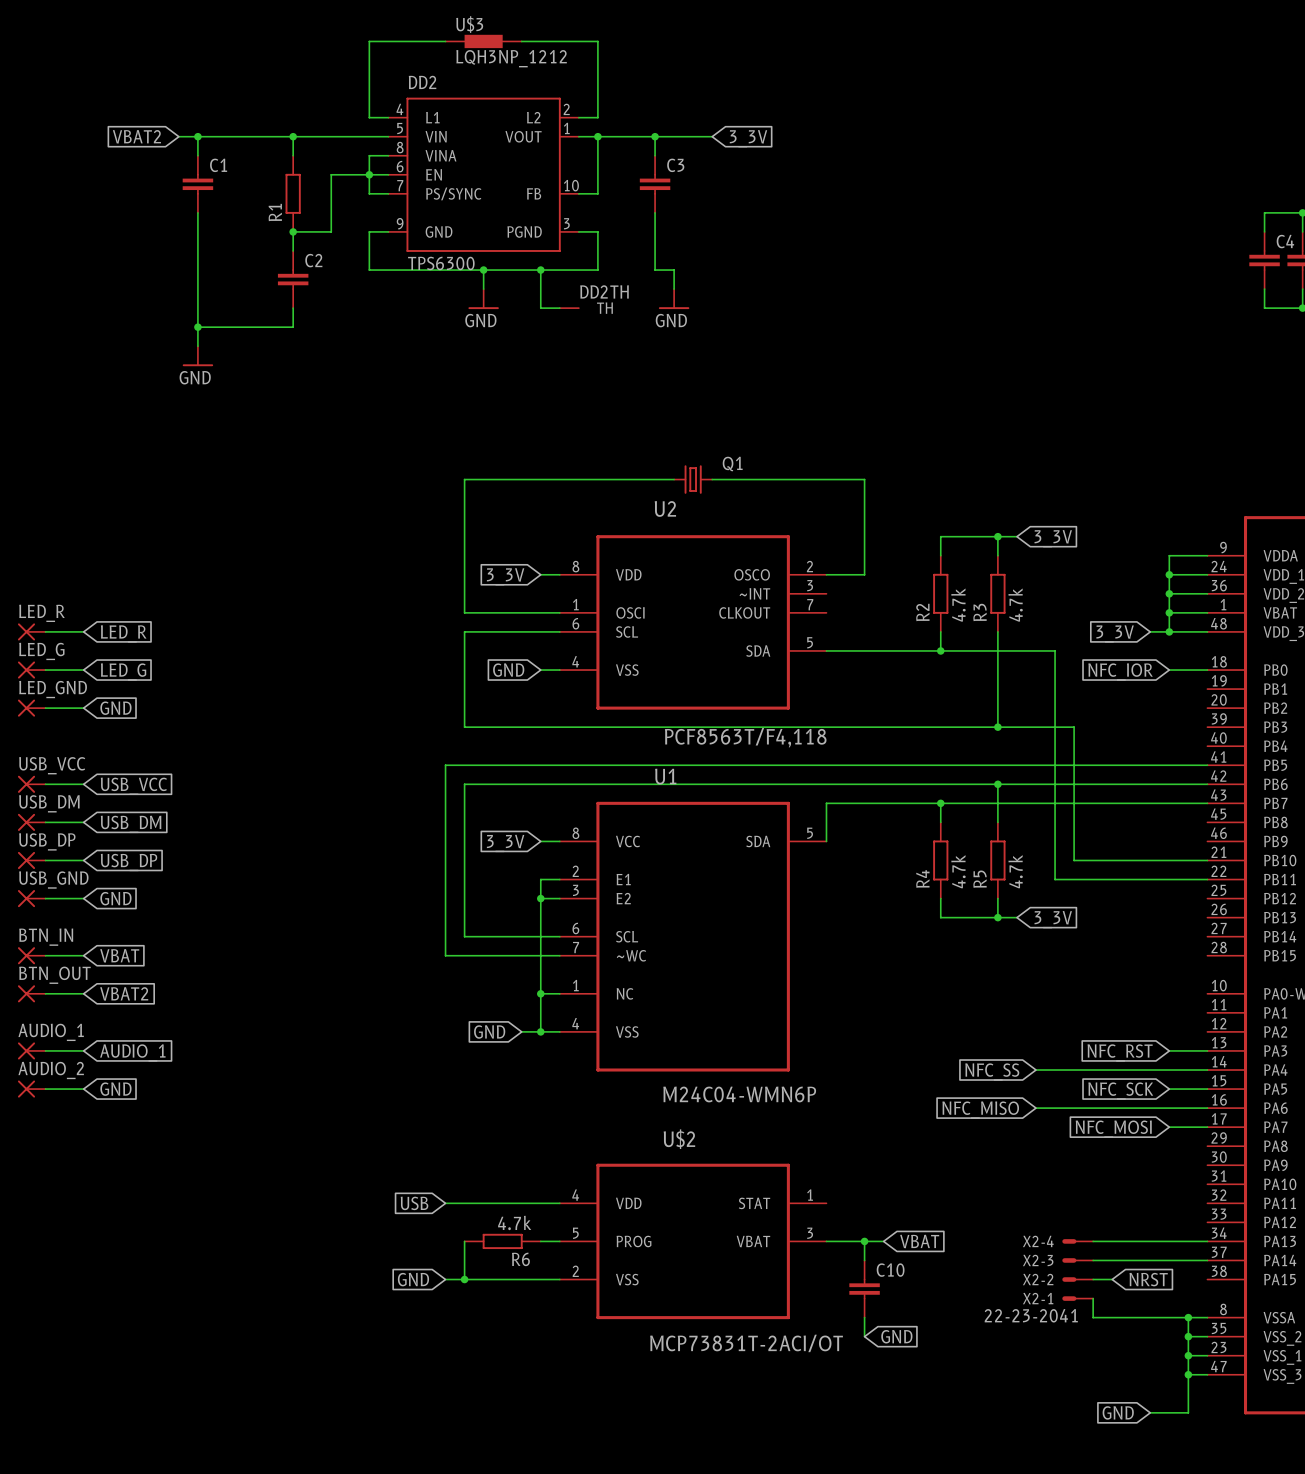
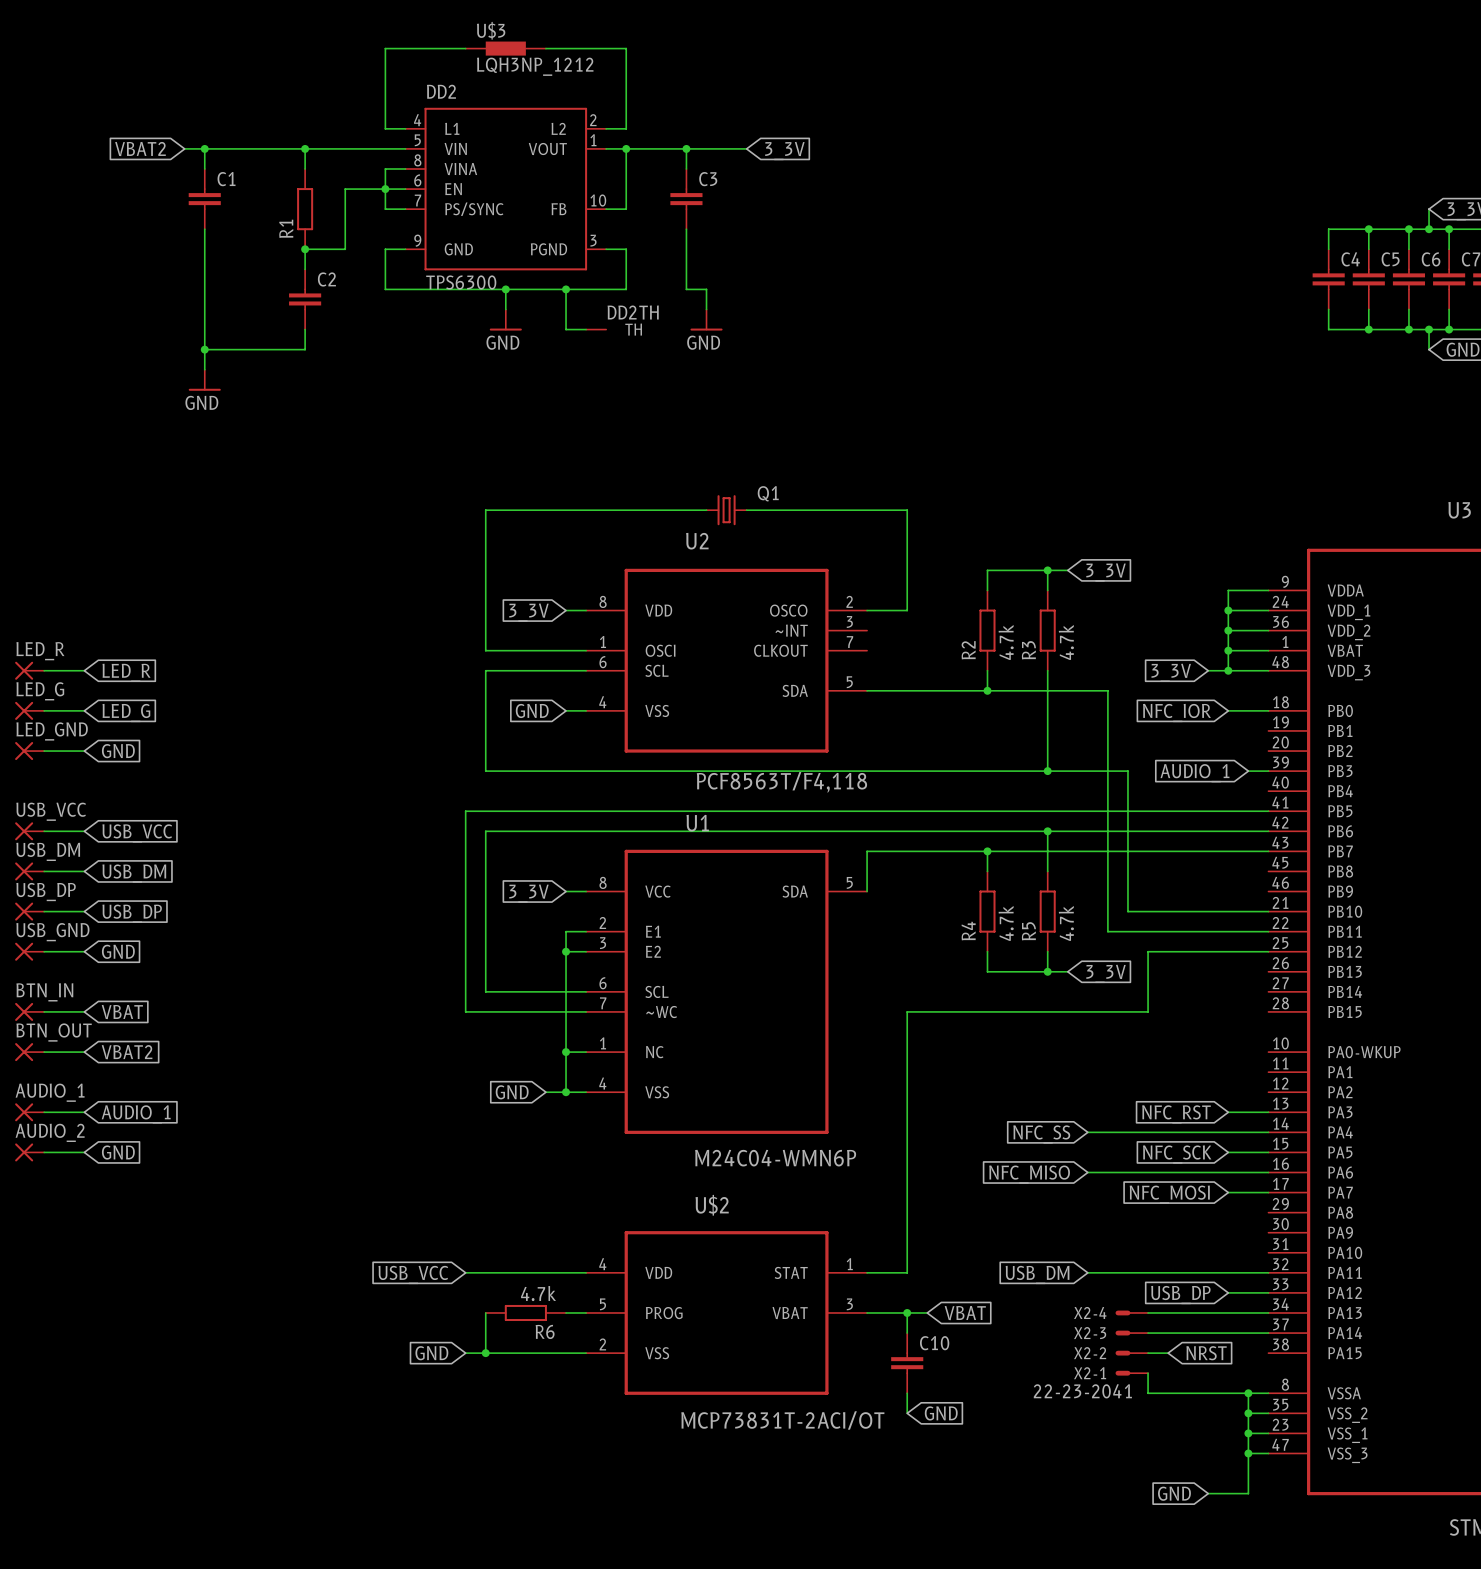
wire: none -> (1248, 771) (1268, 771)
global label: none -> AUDIO_1 (1194, 773)
wire: none -> (1268, 951) (1148, 951) (1148, 1011) (907, 1011) (907, 1272) (867, 1272)
global label: USB (414, 1203) -> USB_VCC (413, 1274)
wire: none -> (1087, 1272) (1268, 1272)
global label: none -> USB_DM (1037, 1274)
wire: none -> (1228, 1292) (1268, 1292)
global label: none -> USB_DP (1180, 1295)

